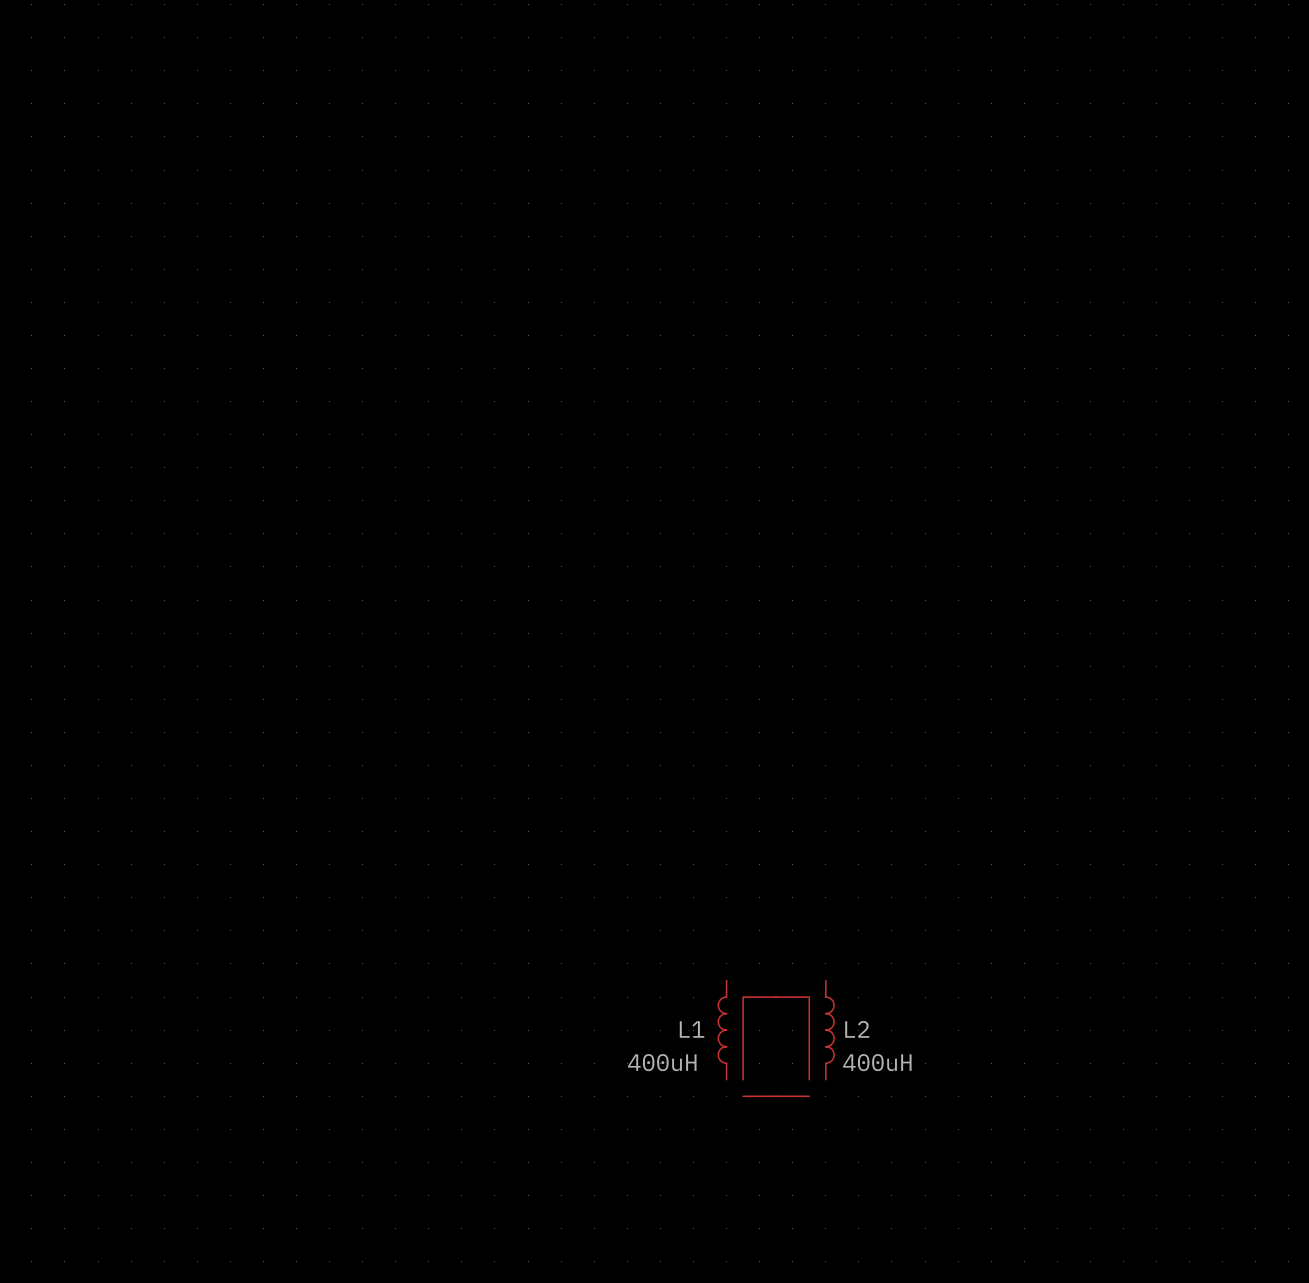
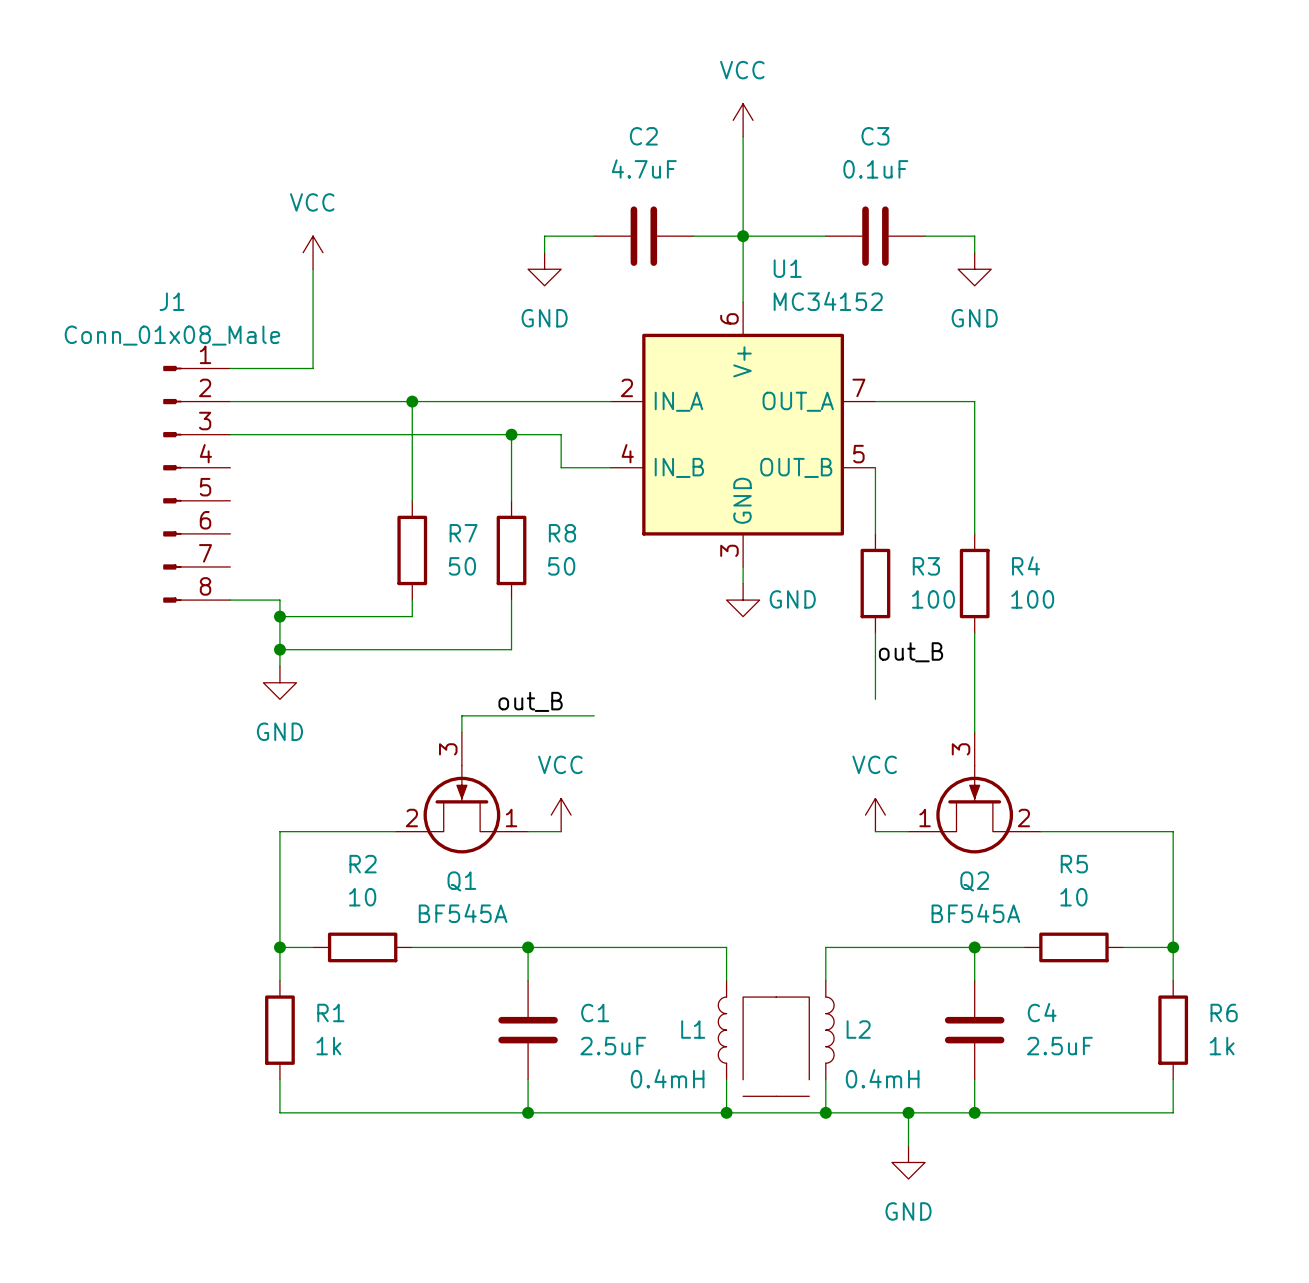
power symbol: none -> VCC (743, 120)
wire: none -> (743, 136) (743, 302)
wire: none -> (594, 236) (544, 236) (544, 252)
C2: none -> 4.7uF (643, 236)
wire: none -> (693, 236) (825, 236)
junction: none -> (743, 236)
C3: none -> 0.1uF (875, 236)
wire: none -> (925, 236) (974, 236) (974, 252)
power symbol: none -> VCC (313, 252)
wire: none -> (313, 269) (313, 368) (230, 368)
power symbol: none -> GND (544, 269)
power symbol: none -> GND (974, 269)
wire: none -> (230, 401) (610, 401)
wire: none -> (412, 401) (412, 500)
junction: none -> (412, 401)
wire: none -> (875, 401) (974, 401) (974, 533)
wire: none -> (230, 434) (561, 434) (561, 467) (610, 467)
wire: none -> (511, 434) (511, 500)
junction: none -> (511, 434)
U1: none -> MC34152 (743, 434)
wire: none -> (875, 467) (875, 533)
J1: none -> Conn_01x08_Male (196, 484)
R7: none -> 50 (412, 550)
R8: none -> 50 (511, 550)
wire: none -> (743, 566) (743, 583)
R3: none -> 100 (875, 583)
R4: none -> 100 (974, 583)
wire: none -> (230, 600) (279, 600) (279, 666)
wire: none -> (412, 600) (412, 616) (279, 616)
wire: none -> (511, 600) (511, 649) (279, 649)
power symbol: none -> GND (743, 600)
junction: none -> (279, 616)
wire: none -> (875, 633) (875, 699)
wire: none -> (974, 633) (974, 732)
junction: none -> (279, 649)
label: none -> out_B (911, 652)
power symbol: none -> GND (279, 682)
label: none -> out_B (530, 701)
wire: none -> (594, 715) (461, 715) (461, 732)
Q1: none -> BF545A (461, 792)
Q2: none -> BF545A (974, 792)
power symbol: none -> VCC (561, 815)
power symbol: none -> VCC (875, 815)
wire: none -> (395, 831) (279, 831) (279, 980)
wire: none -> (528, 831) (561, 831)
wire: none -> (875, 831) (908, 831)
wire: none -> (1040, 831) (1173, 831) (1173, 980)
wire: none -> (279, 947) (313, 947)
junction: none -> (279, 947)
R2: none -> 10 (362, 947)
wire: none -> (412, 947) (726, 947) (726, 980)
wire: none -> (528, 947) (528, 980)
junction: none -> (528, 947)
wire: none -> (974, 947) (974, 980)
junction: none -> (974, 947)
wire: none -> (1024, 947) (825, 947) (825, 980)
R5: none -> 10 (1073, 947)
wire: none -> (1123, 947) (1173, 947)
junction: none -> (1173, 947)
R1: none -> 1k (279, 1030)
C1: none -> 2.5uF (528, 1030)
C4: none -> 2.5uF (974, 1030)
R6: none -> 1k (1173, 1030)
L1 value: 400uH (662, 1062) -> 0.4mH (667, 1078)
L2 value: 400uH (877, 1062) -> 0.4mH (882, 1078)
wire: none -> (279, 1079) (279, 1112) (1173, 1112) (1173, 1079)
wire: none -> (528, 1079) (528, 1112)
wire: none -> (726, 1079) (726, 1112)
wire: none -> (825, 1079) (825, 1112)
wire: none -> (974, 1079) (974, 1112)
junction: none -> (528, 1112)
junction: none -> (726, 1112)
junction: none -> (825, 1112)
wire: none -> (908, 1112) (908, 1145)
junction: none -> (908, 1112)
junction: none -> (974, 1112)
power symbol: none -> GND (908, 1162)

